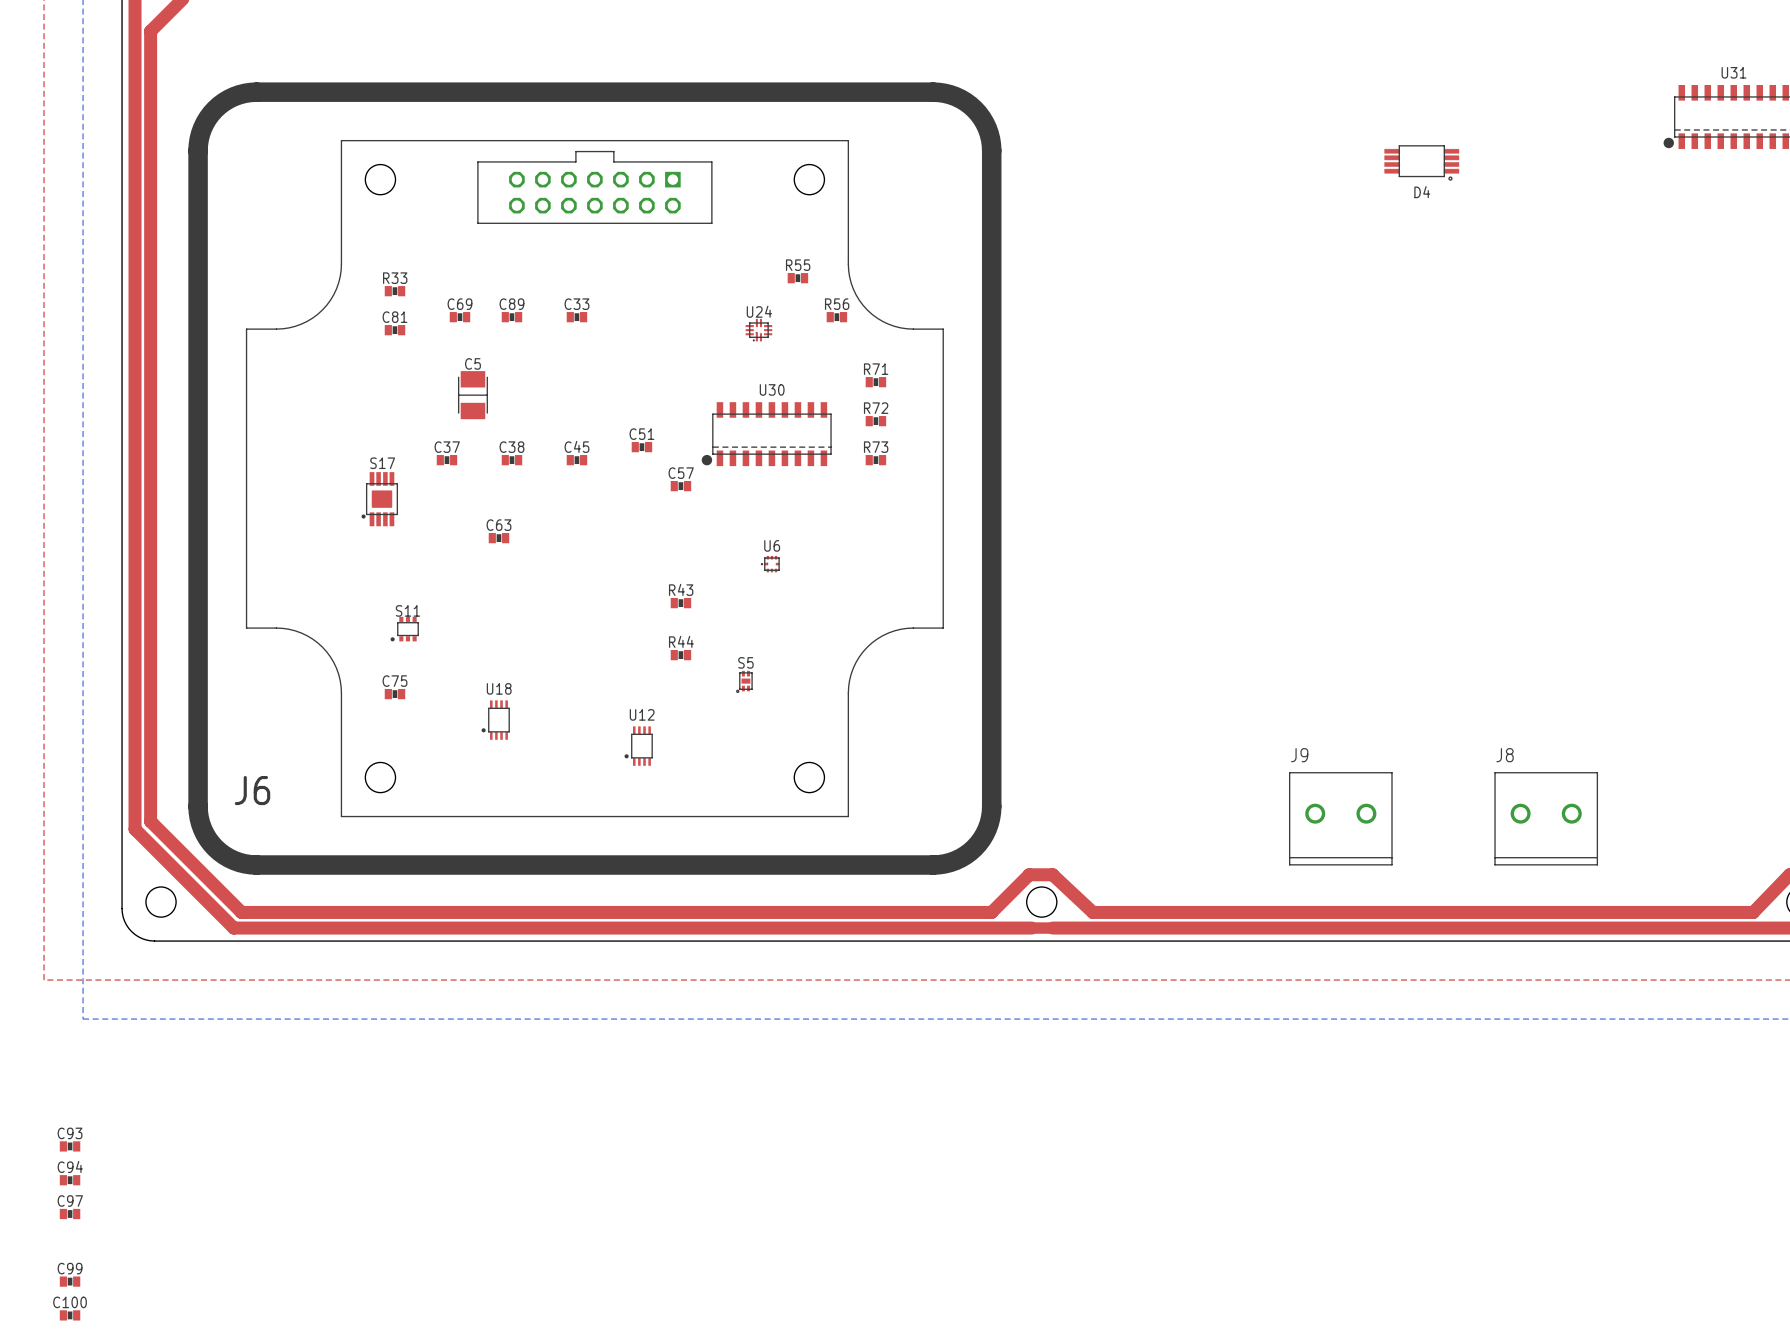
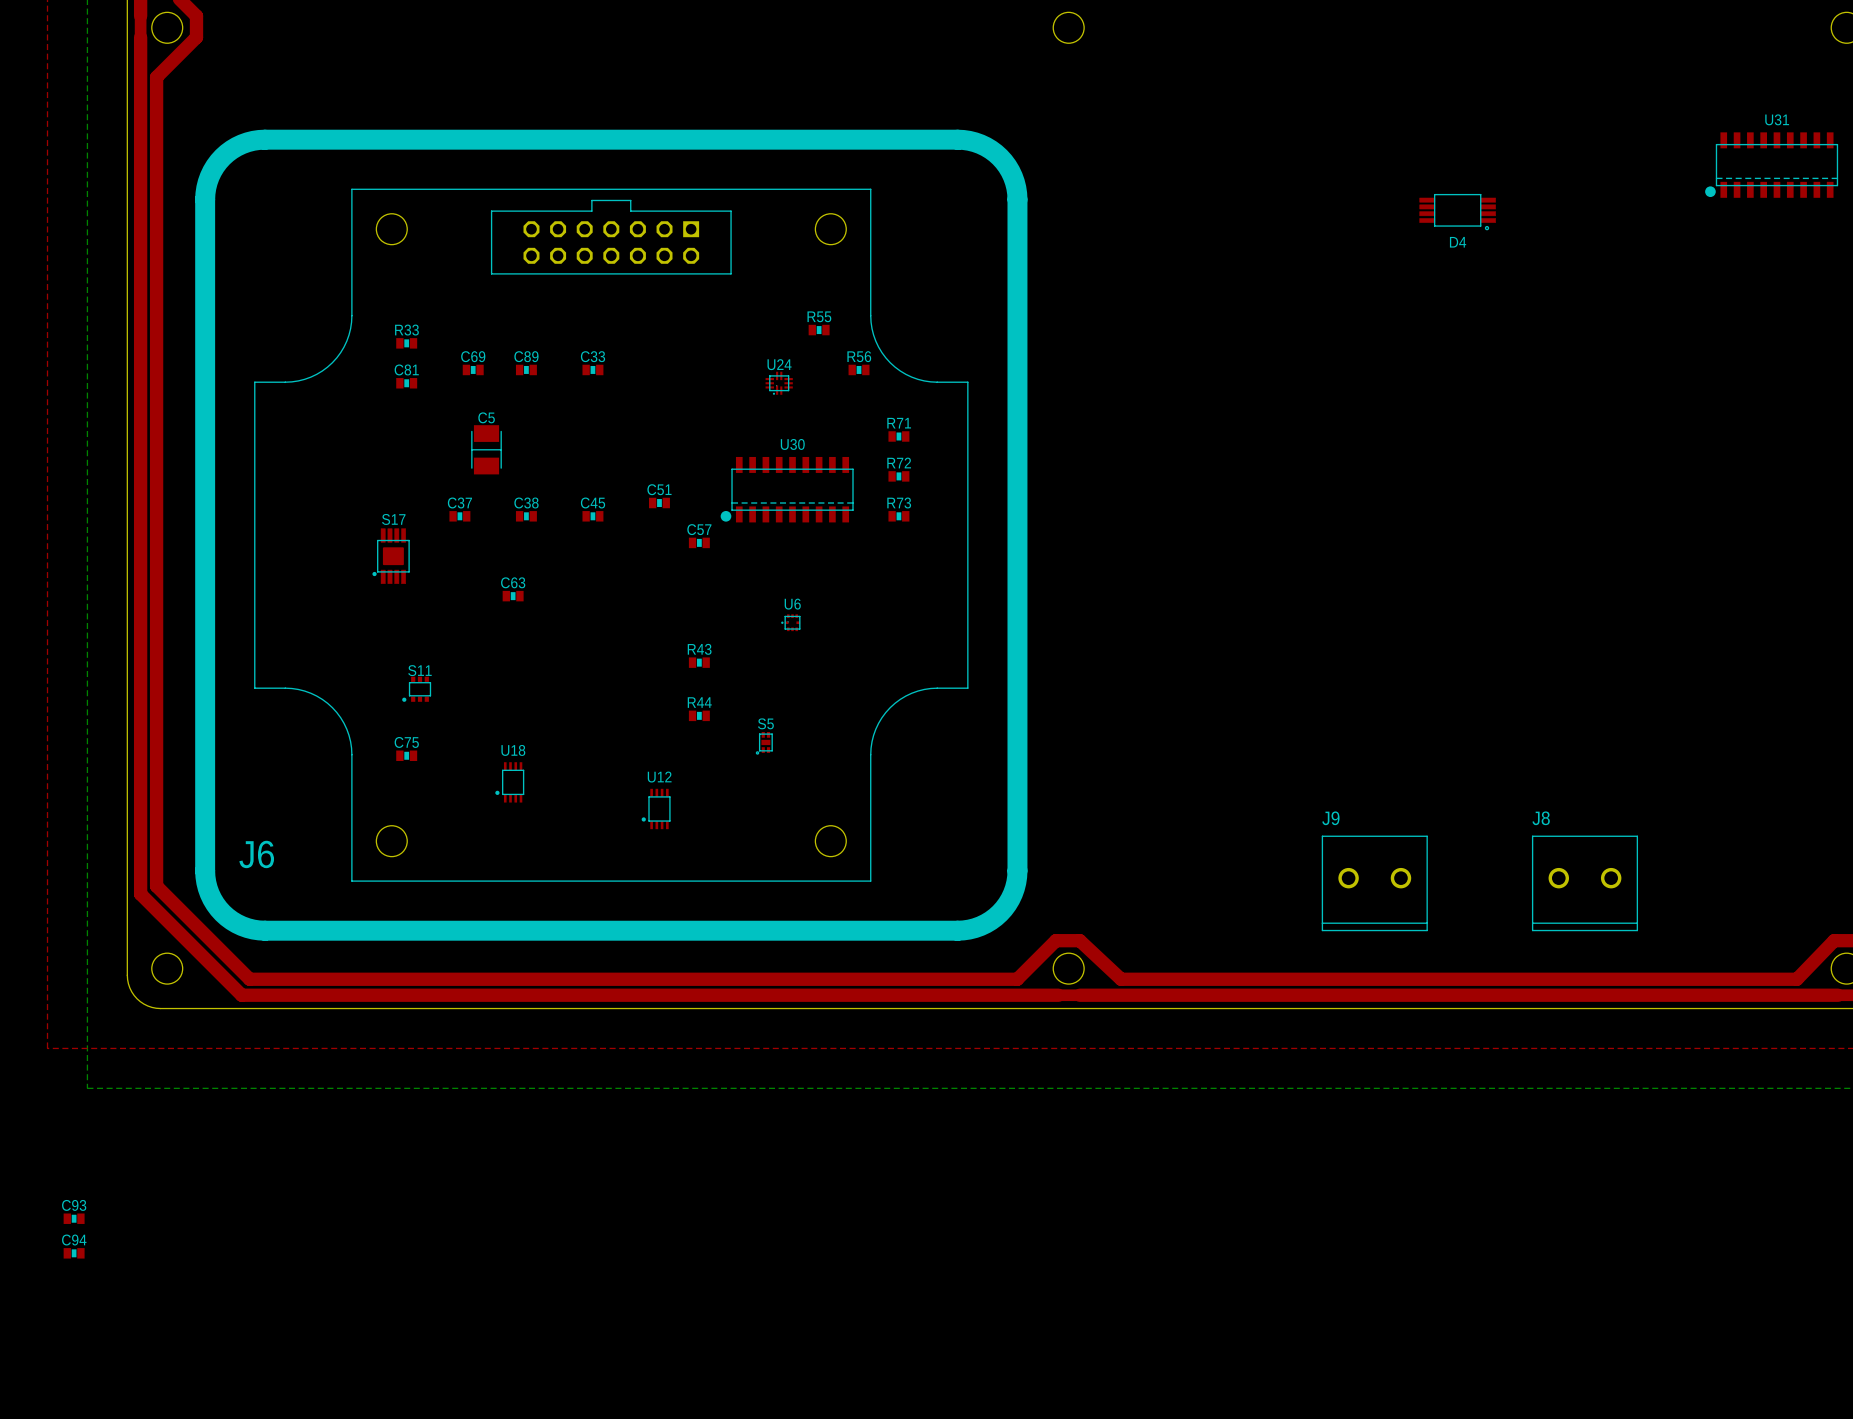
C97: (70, 1214) -> none
C99: (70, 1281) -> none
C100: (70, 1315) -> none

